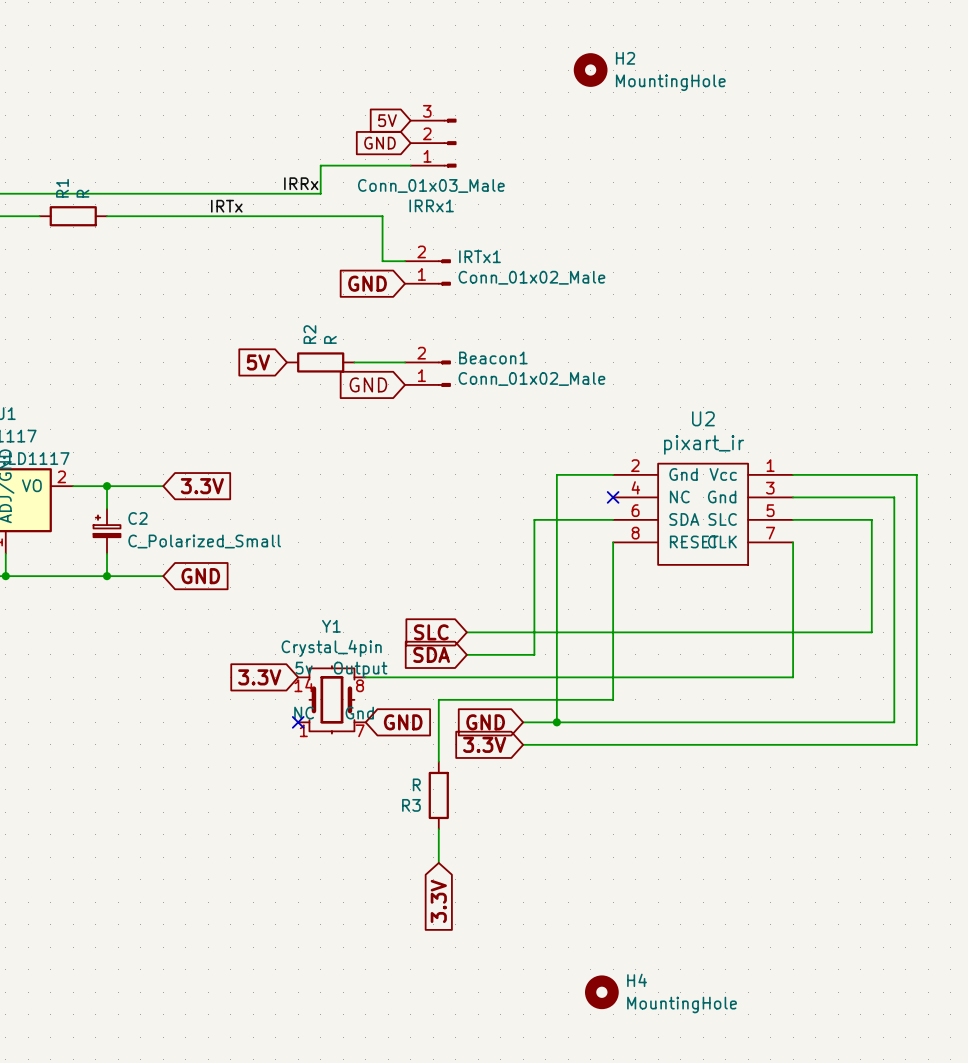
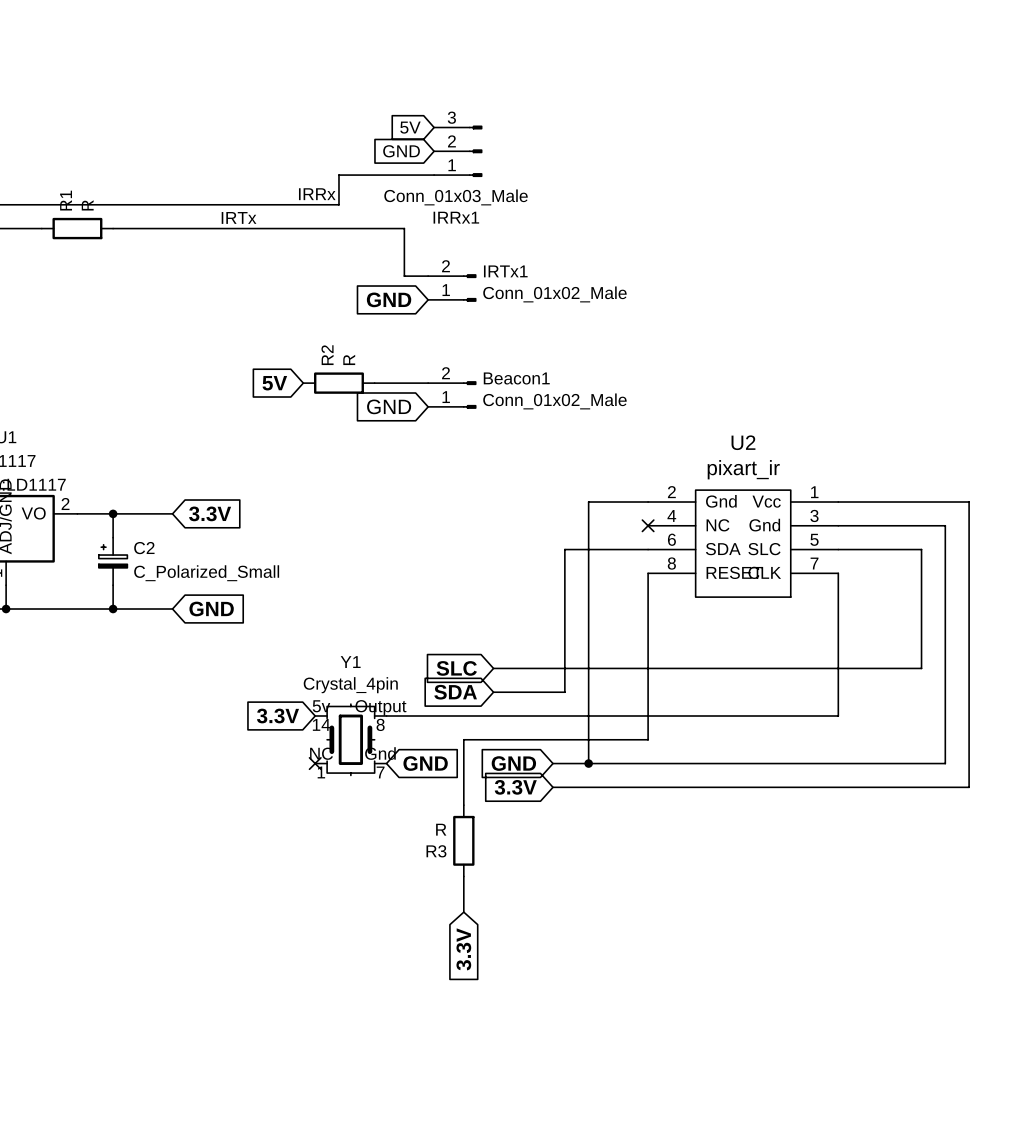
H2: MountingHole (590, 70) -> none
H4: MountingHole (601, 992) -> none

